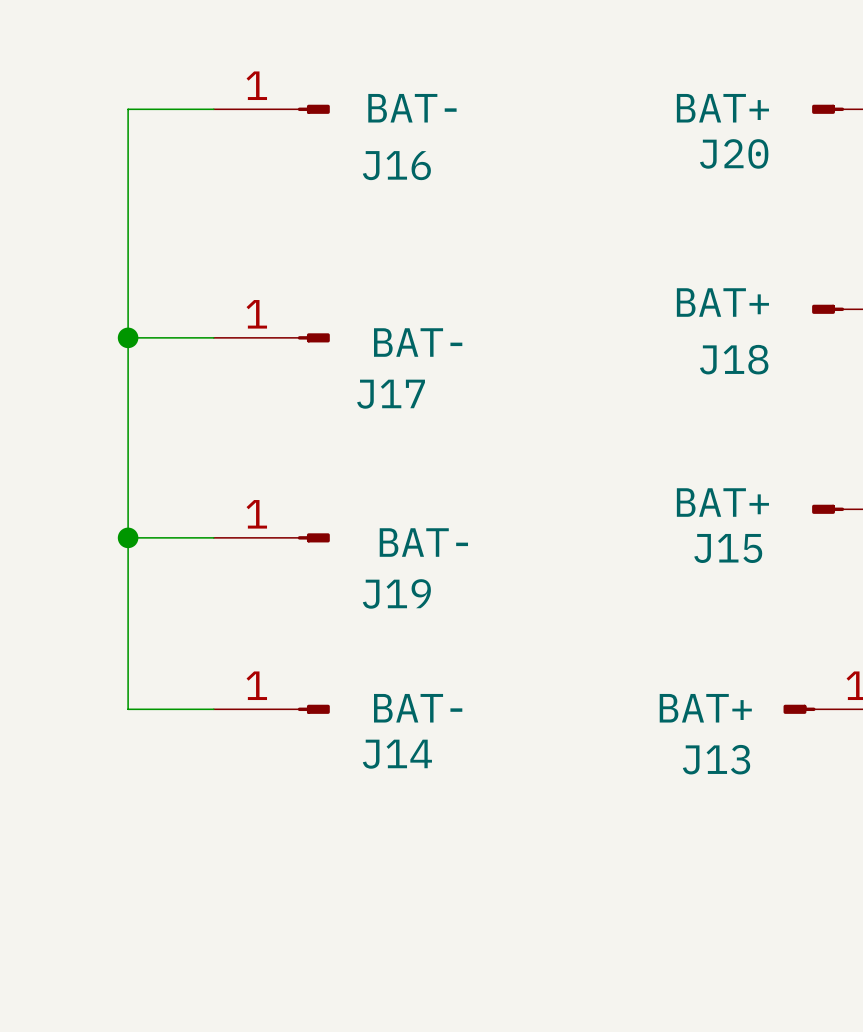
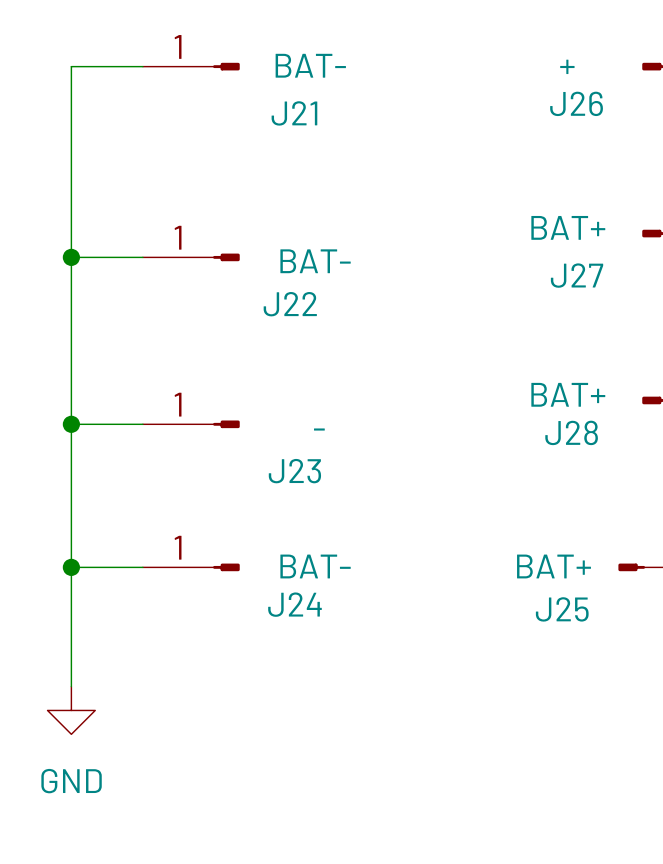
J20 value: BAT+ (722, 108) -> + (567, 66)
J20 name: J20 (734, 153) -> J26 (576, 103)
J16 name: J16 (396, 165) -> J21 (294, 113)
J18 name: J18 (734, 359) -> J27 (577, 275)
J17 name: J17 (391, 394) -> J22 (290, 304)
J19 value: BAT- (423, 542) -> - (319, 429)
J15 name: J15 (728, 548) -> J28 (571, 432)
J19 name: J19 (396, 593) -> J23 (294, 471)
wire: none -> (71, 567) (71, 686)
junction: none -> (71, 567)
J14 name: J14 (397, 754) -> J24 (294, 604)
J13 name: J13 (716, 759) -> J25 (562, 609)
power symbol: none -> GND (71, 710)

